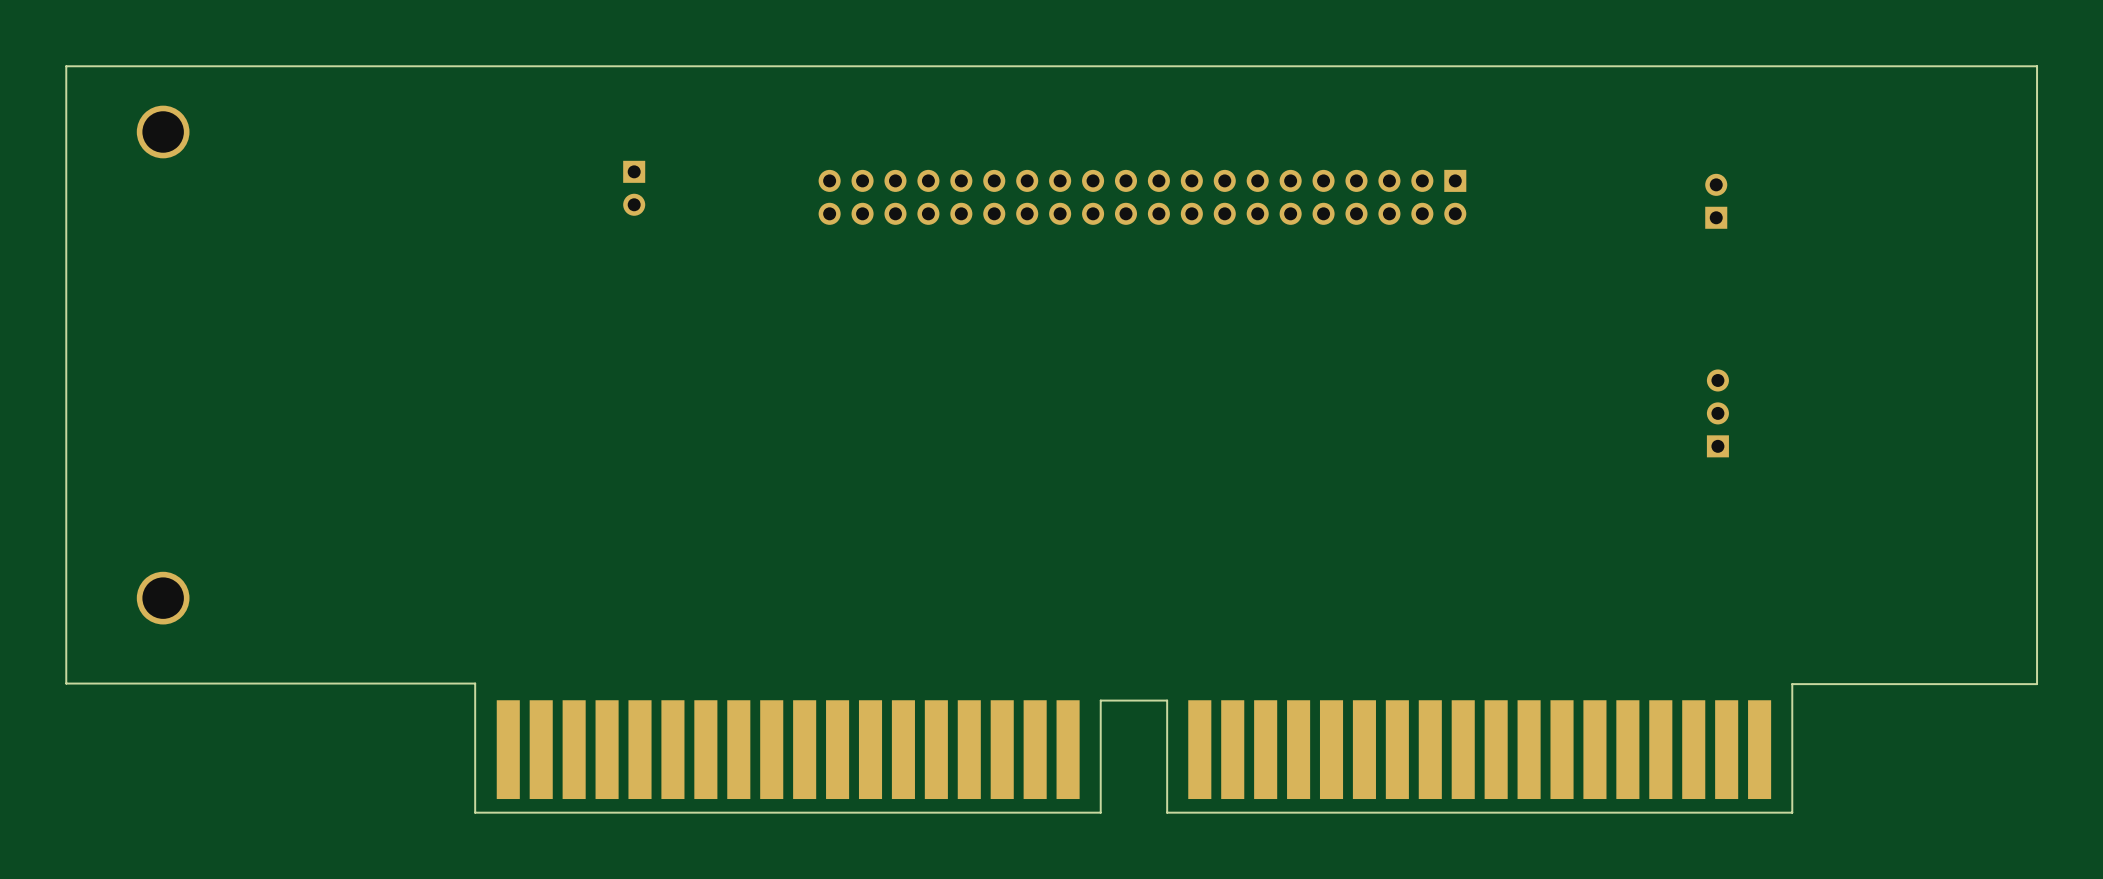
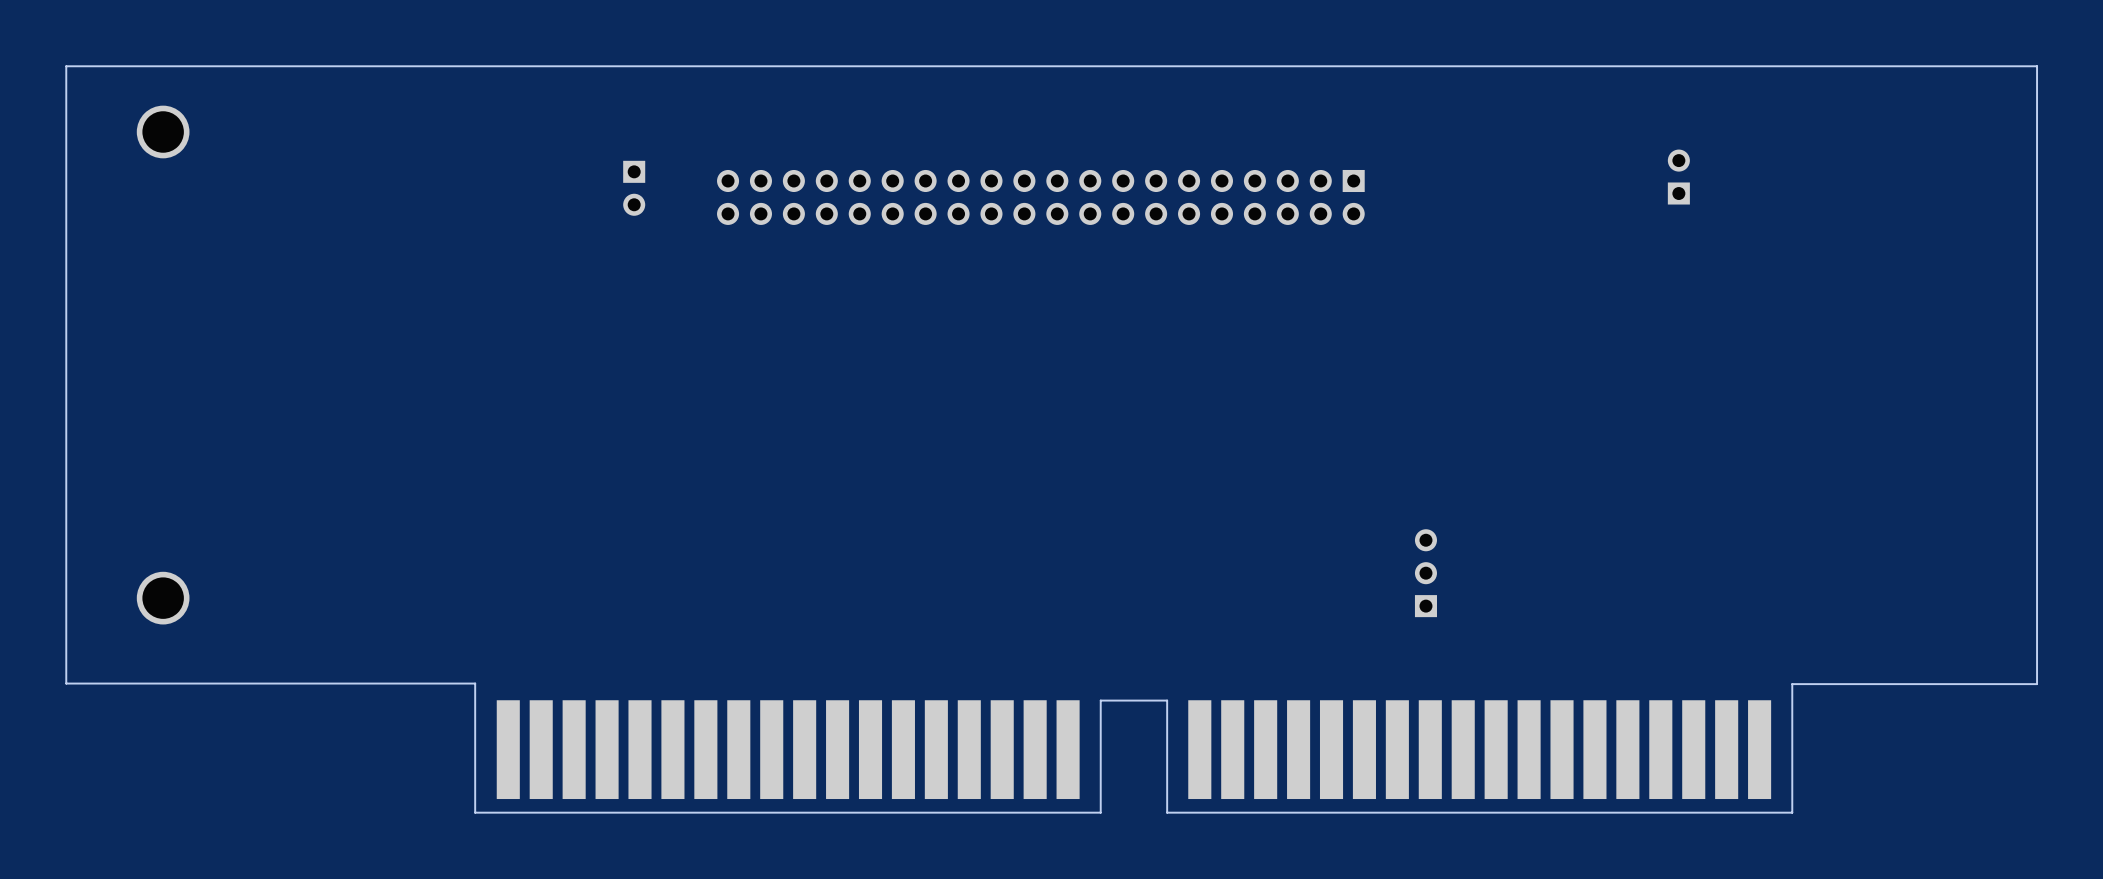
part position: (1142, 197) -> (1040, 197)
part position: (1716, 201) -> (1678, 177)
part: (1717, 413) -> none
part: none -> (1425, 573)

